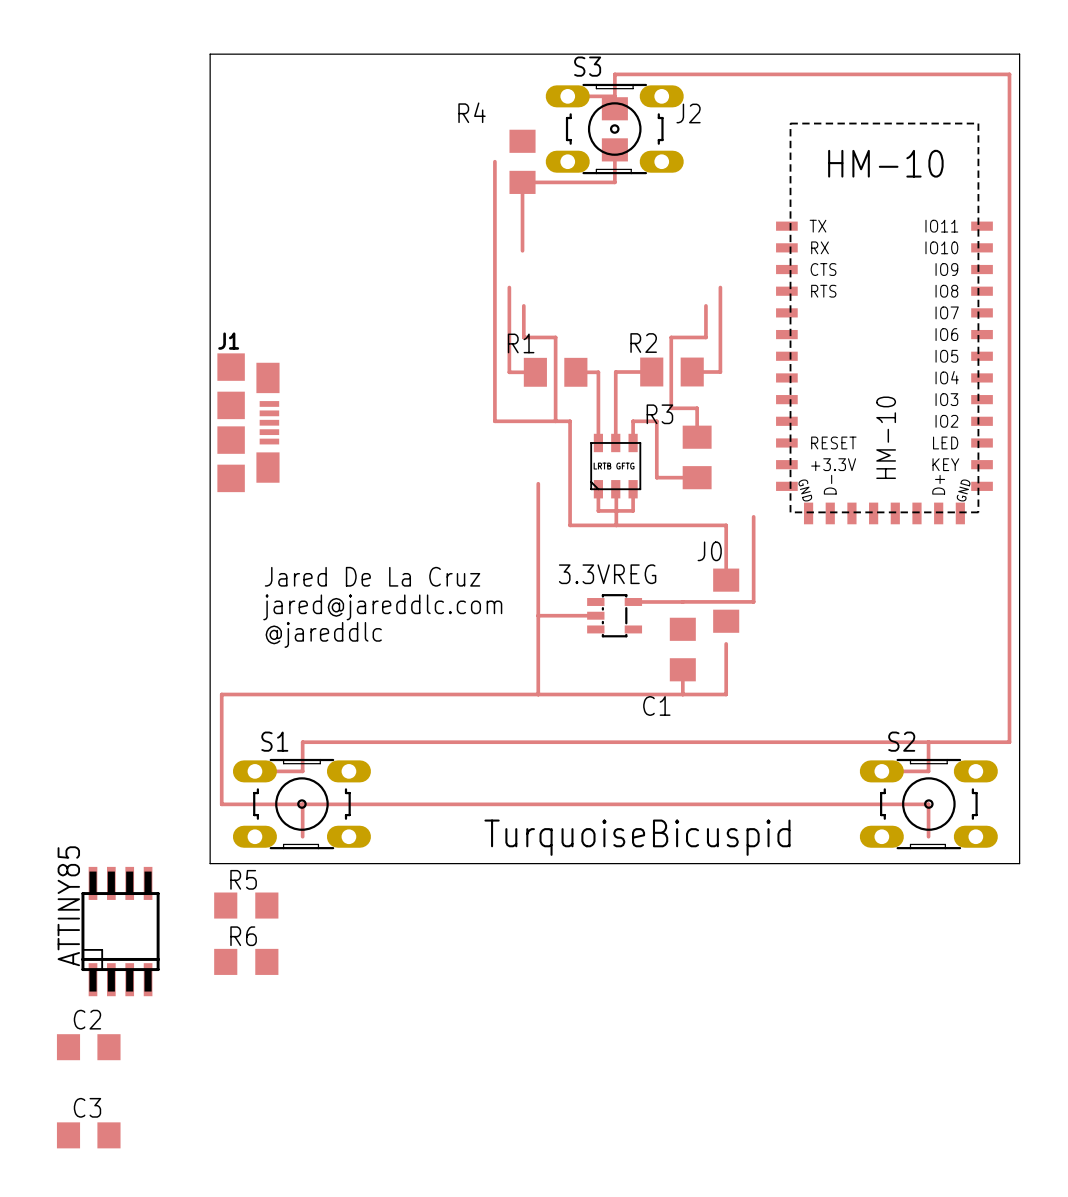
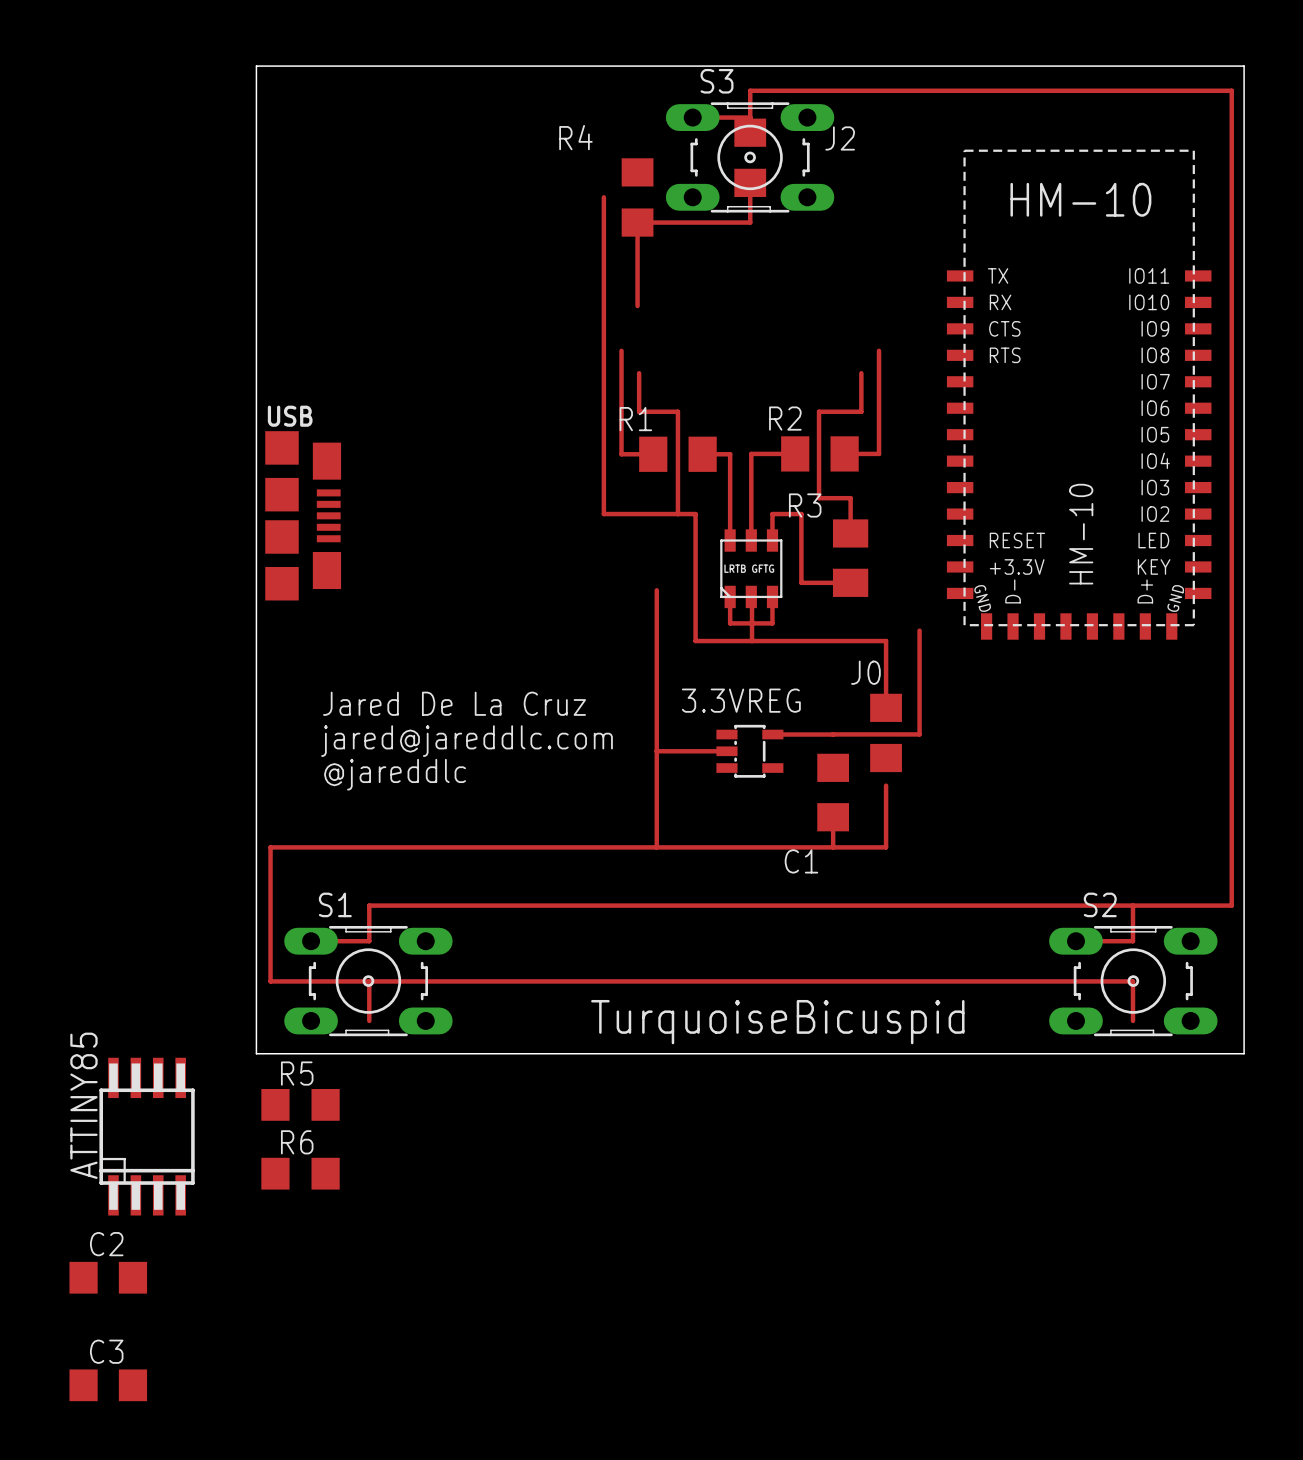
J1 name: J1 (228, 341) -> USB (290, 416)

